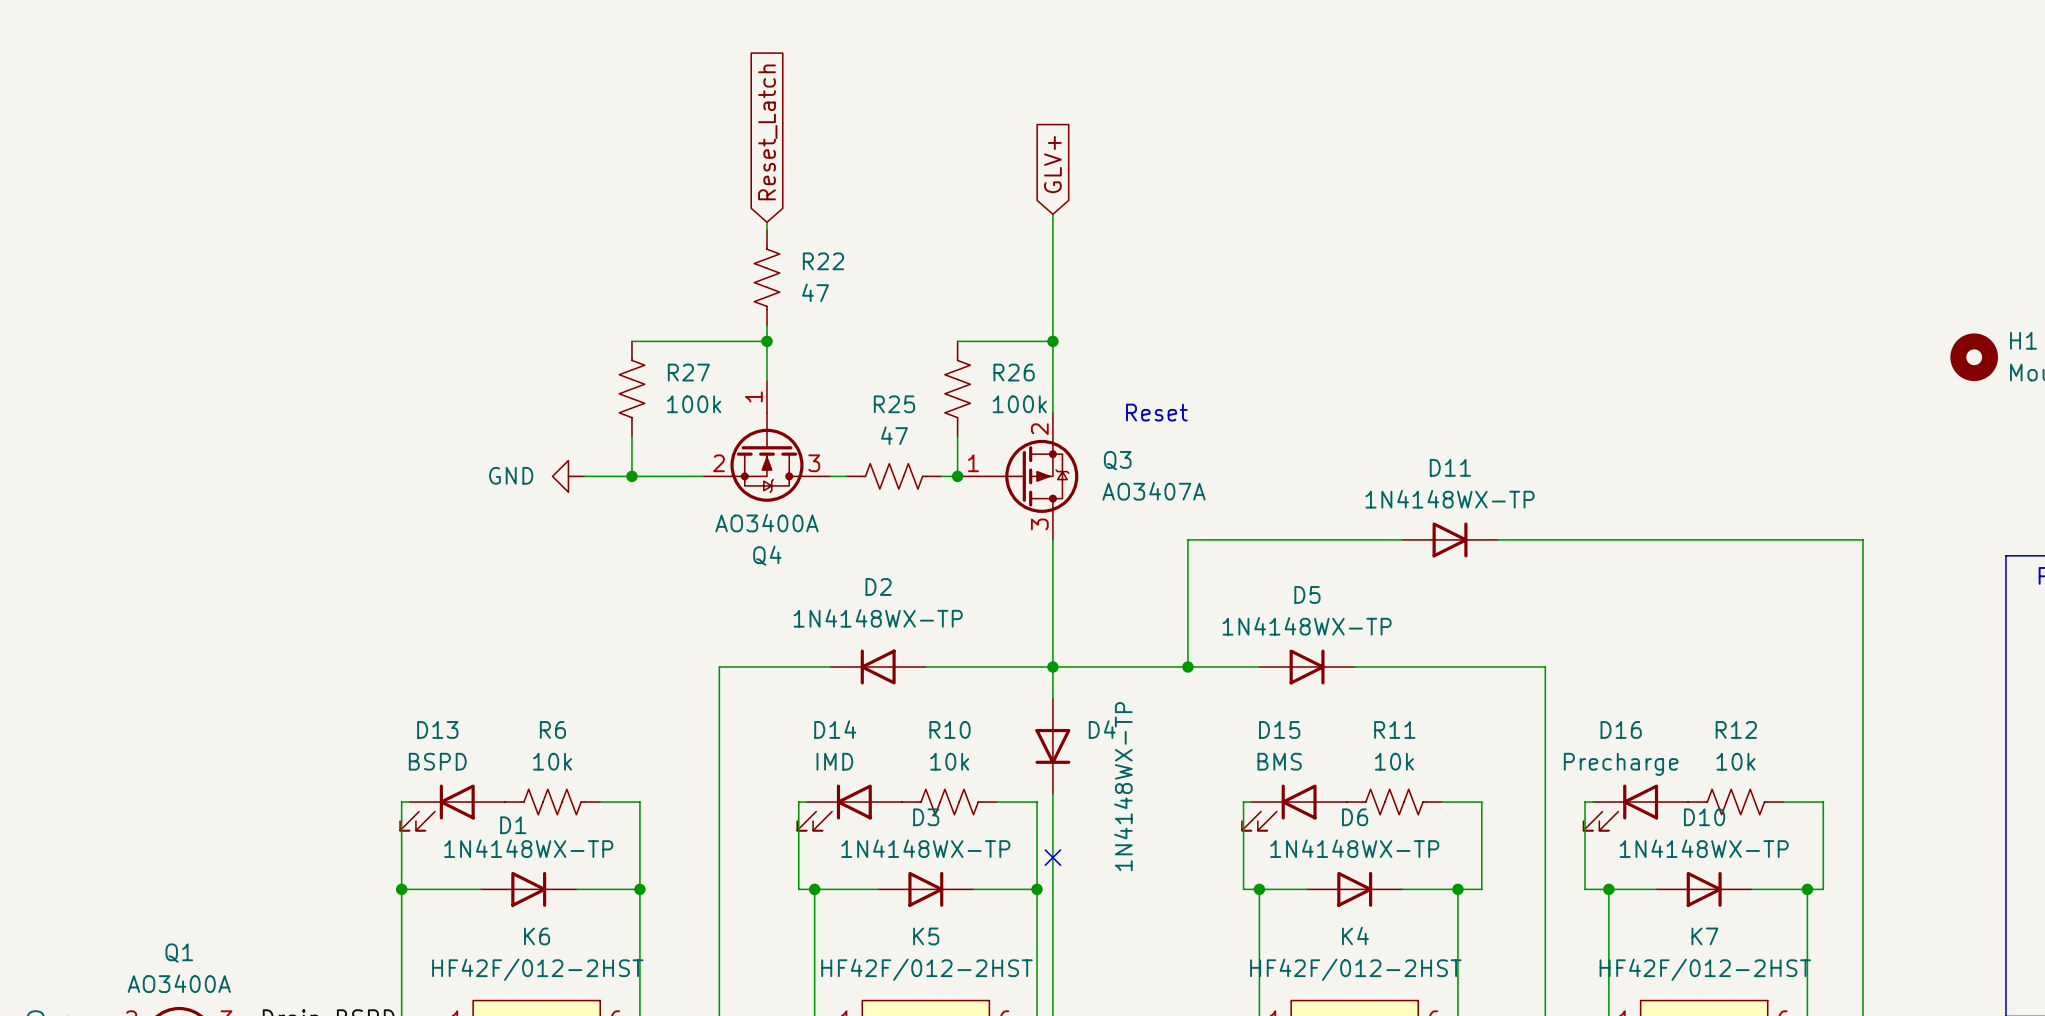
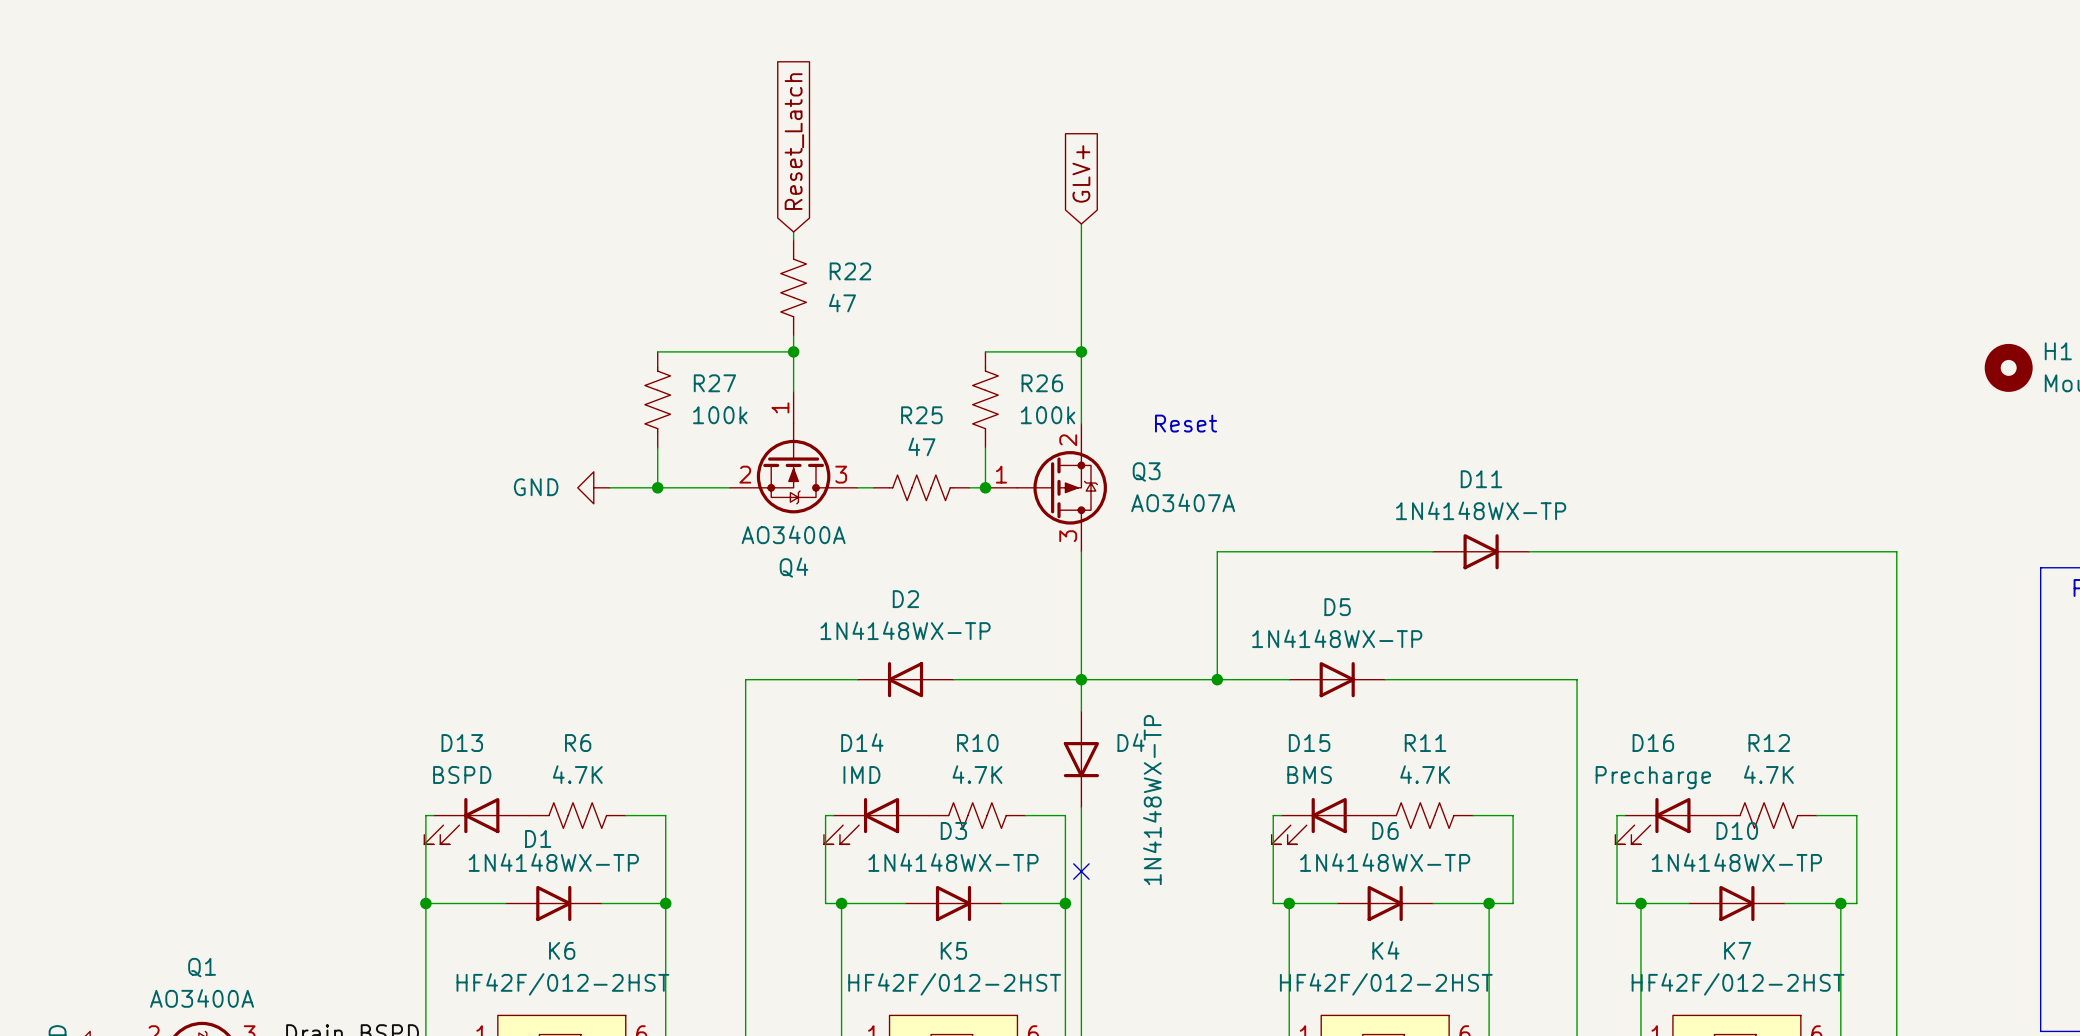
R6 value: 10k (552, 761) -> 4.7K (577, 774)
R10 value: 10k (949, 761) -> 4.7K (977, 774)
R11 value: 10k (1394, 761) -> 4.7K (1425, 774)
R12 value: 10k (1735, 761) -> 4.7K (1768, 774)

